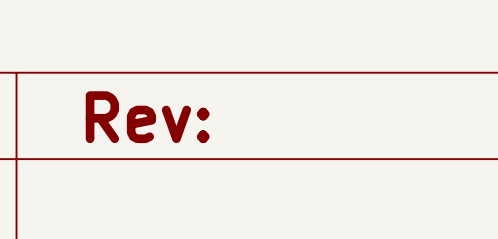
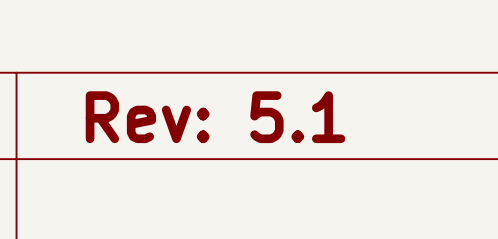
title block: Rev: (147, 117) -> Rev: 5.1 (215, 117)

